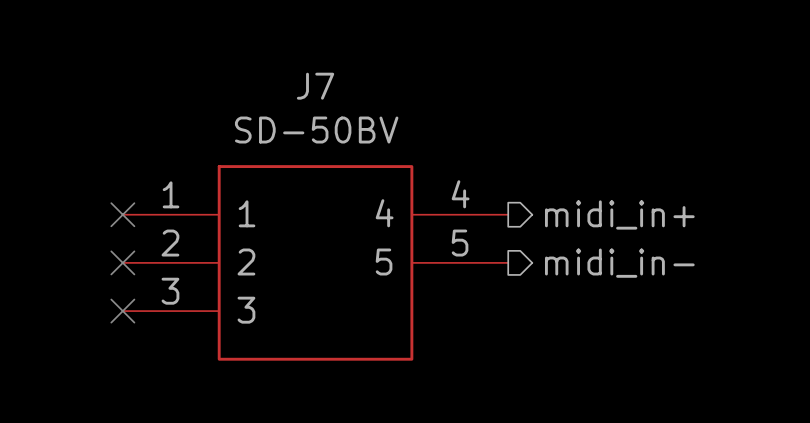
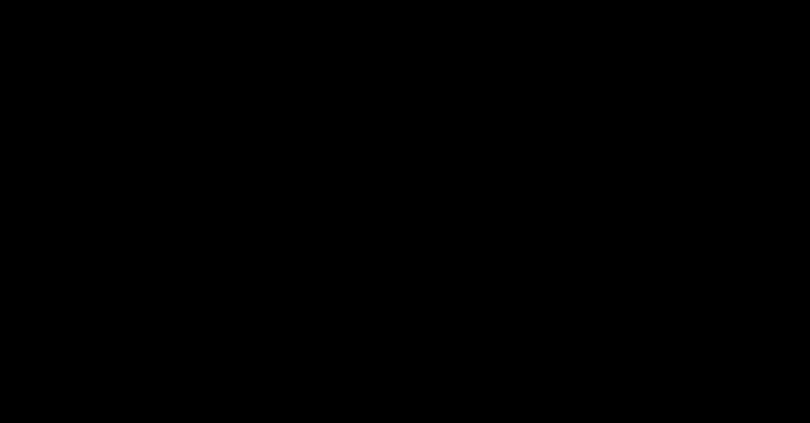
no-connect mark: (122, 214) -> none
hierarchical label: midi_in+ (619, 214) -> none
no-connect mark: (122, 262) -> none
J7: SD-50BV (315, 262) -> none
hierarchical label: midi_in- (619, 263) -> none
no-connect mark: (122, 311) -> none

